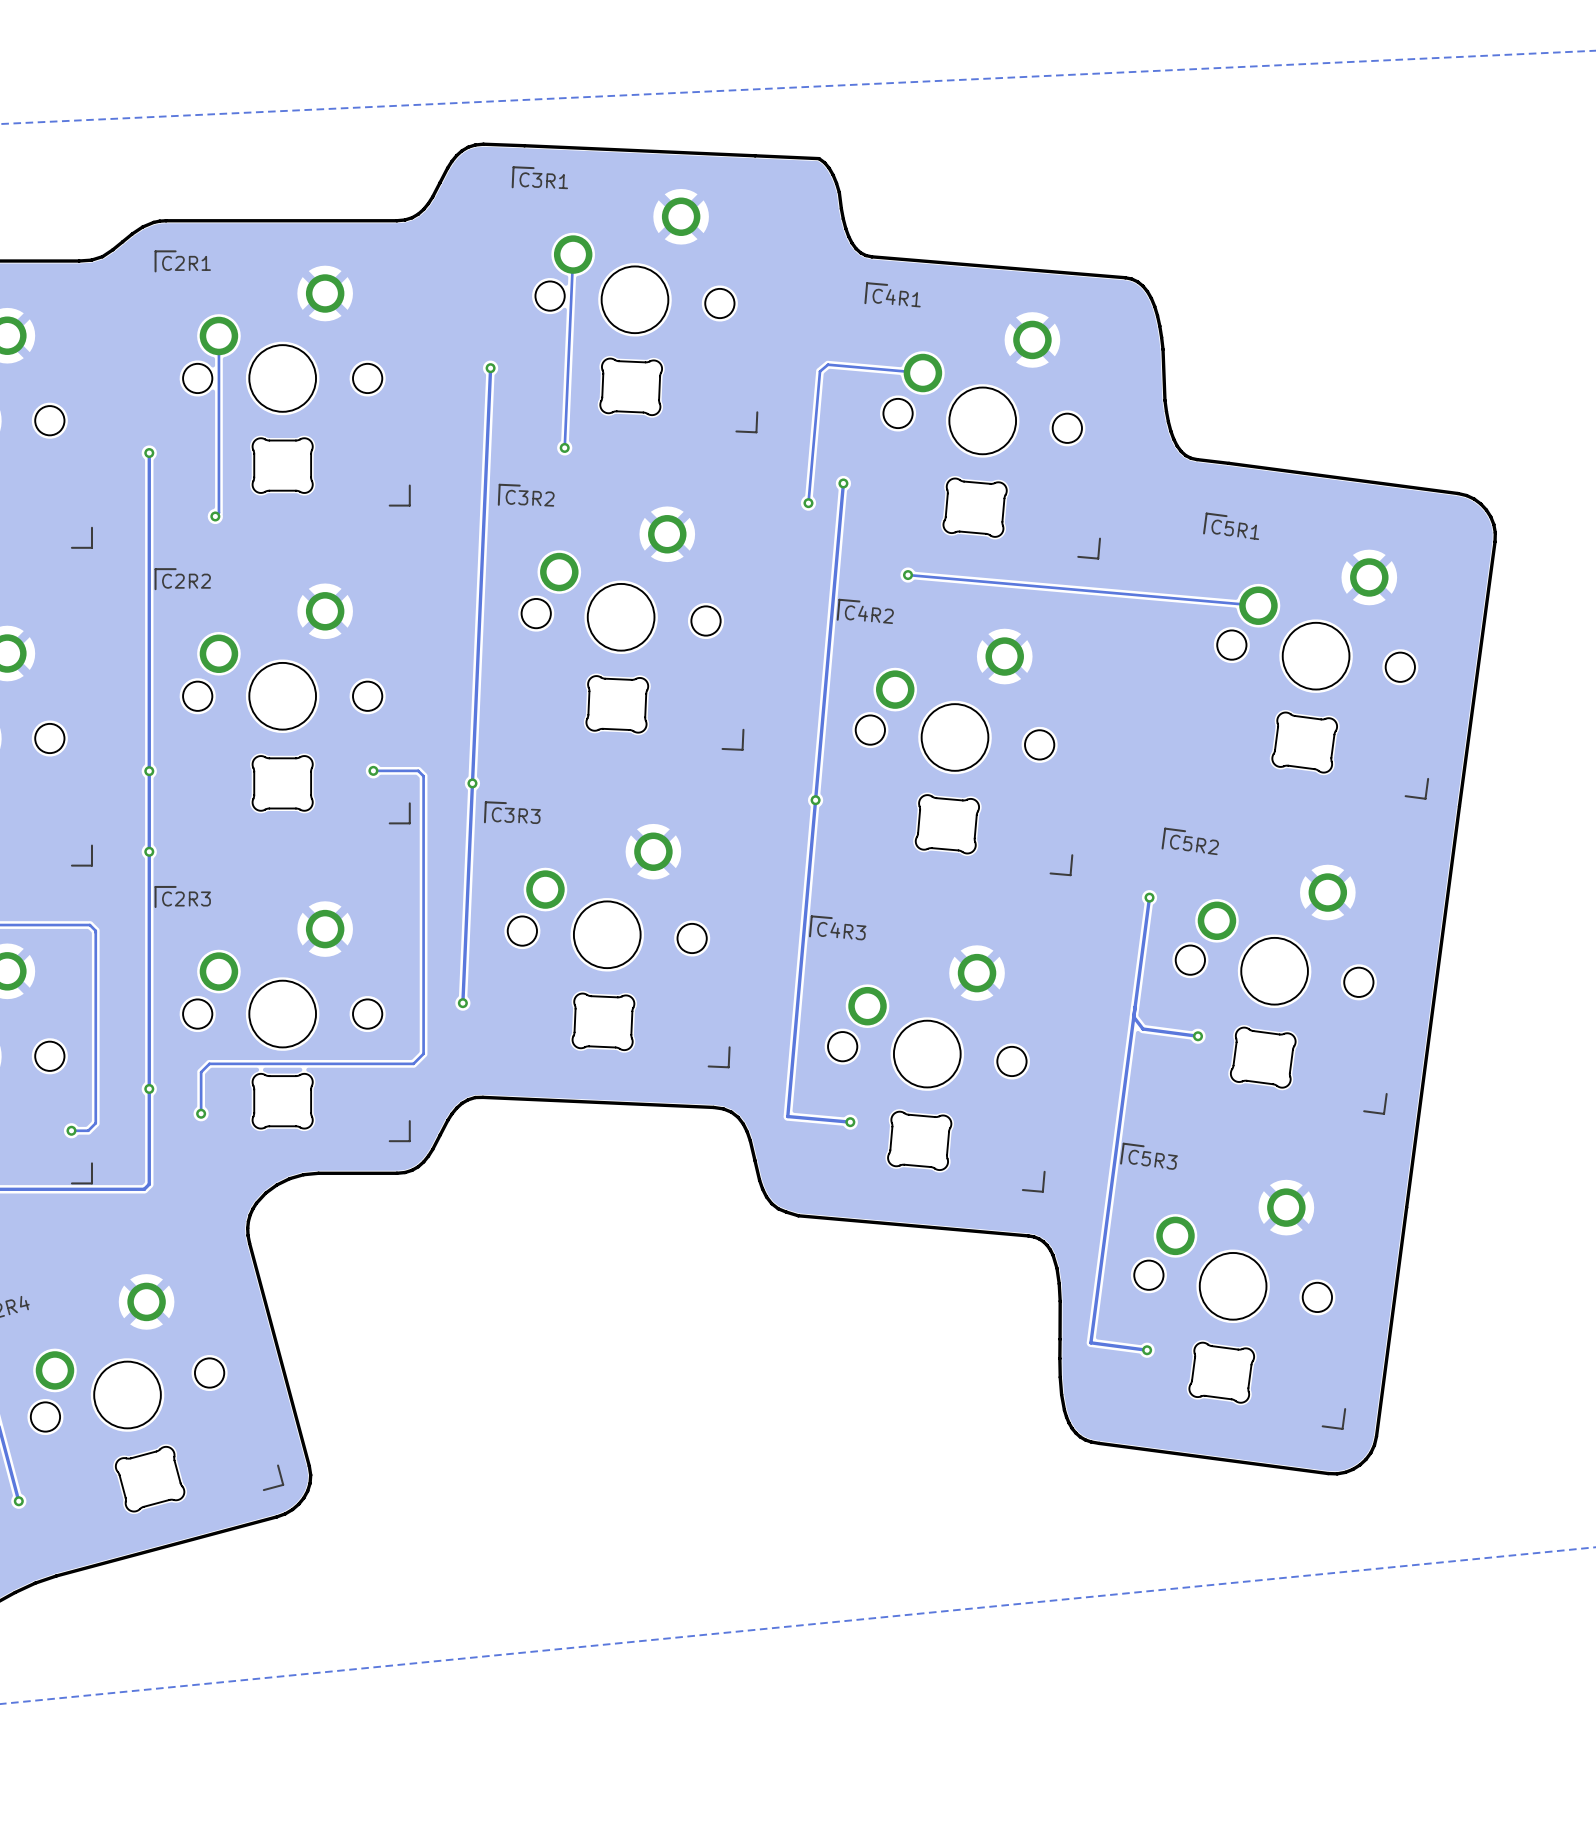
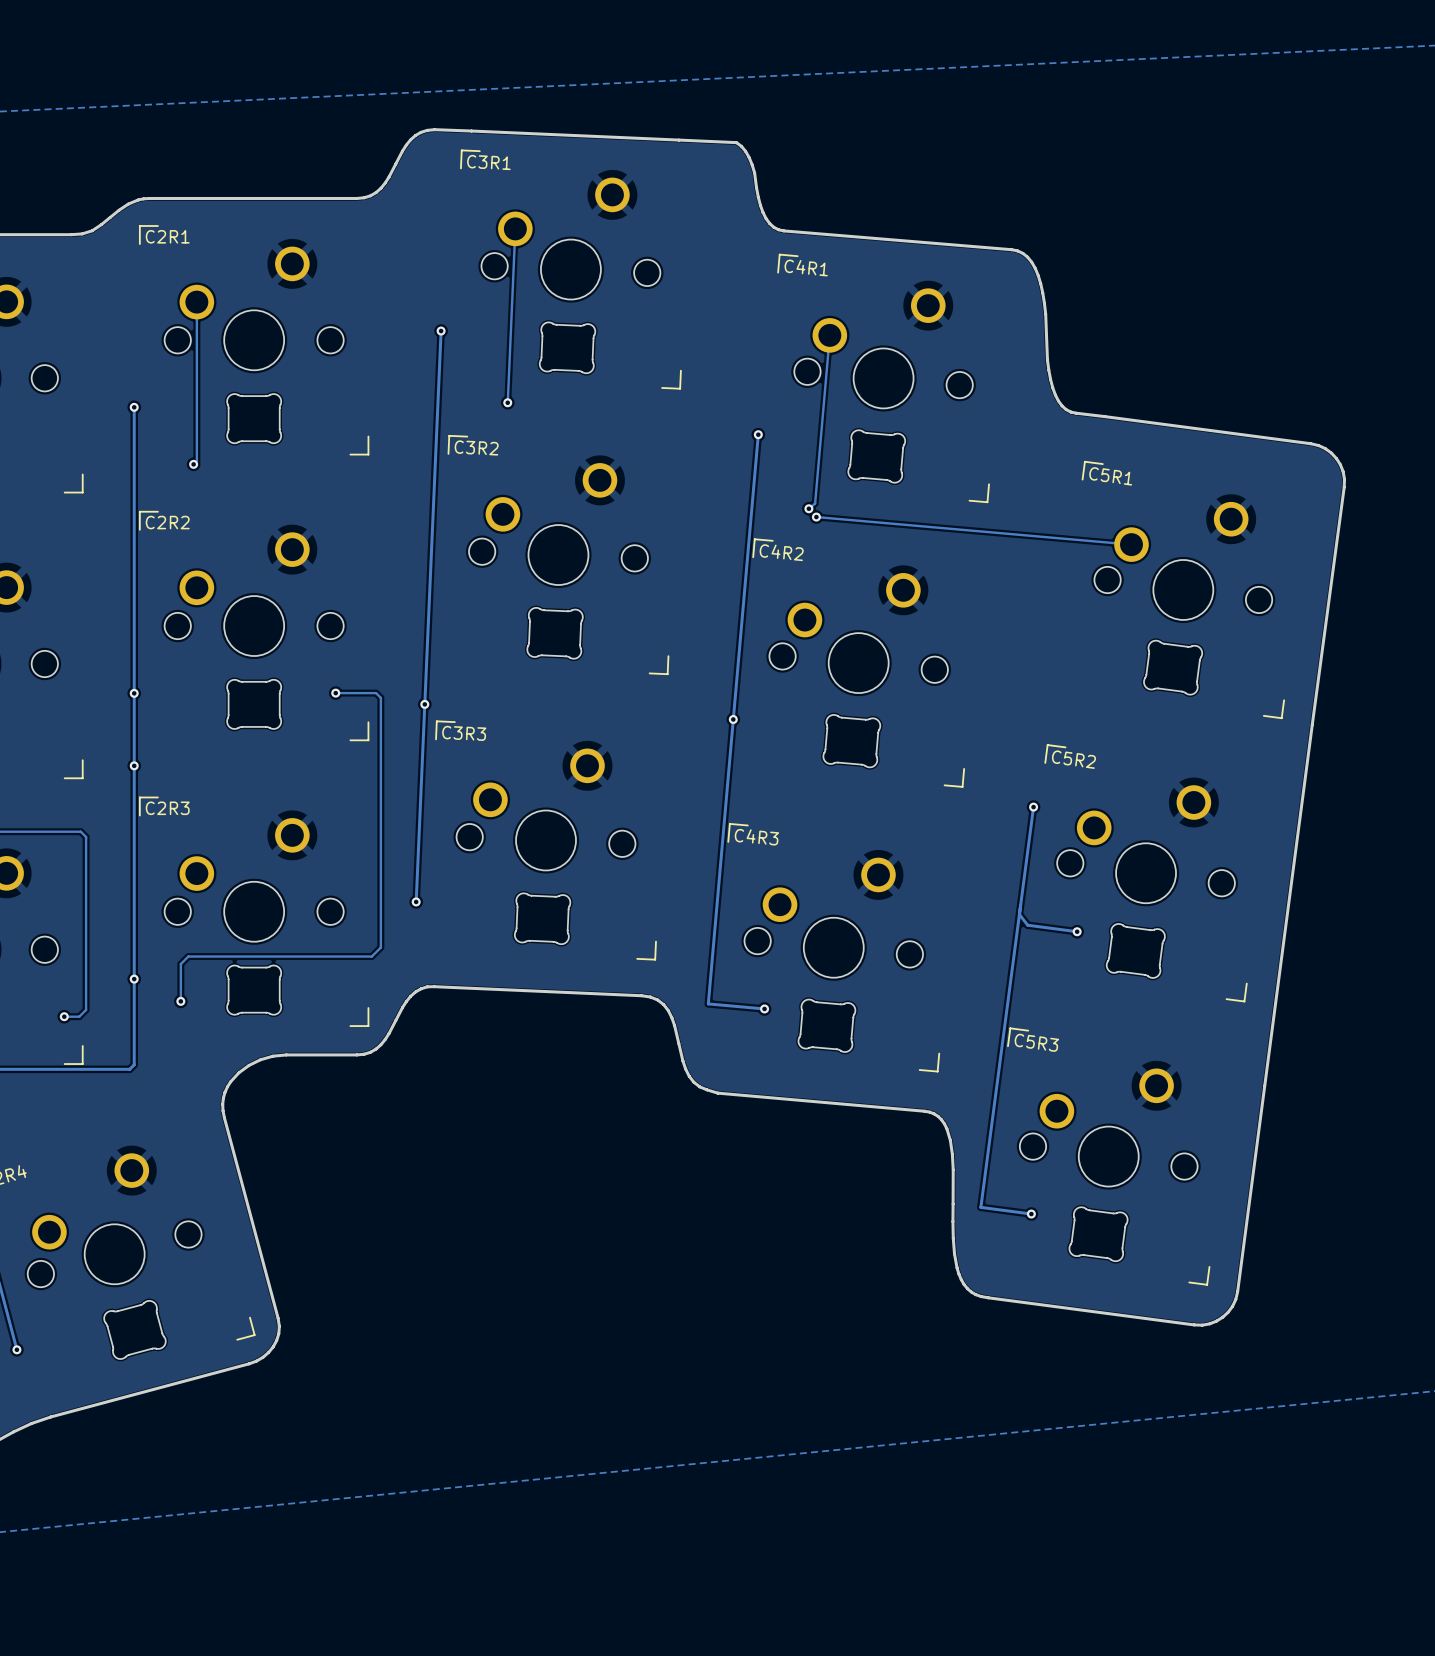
track: (922, 373) (828, 364) (820, 371) (808, 503) -> (829, 335) (815, 503) (808, 508)
via: (808, 503) -> none
via: none -> (808, 508)

